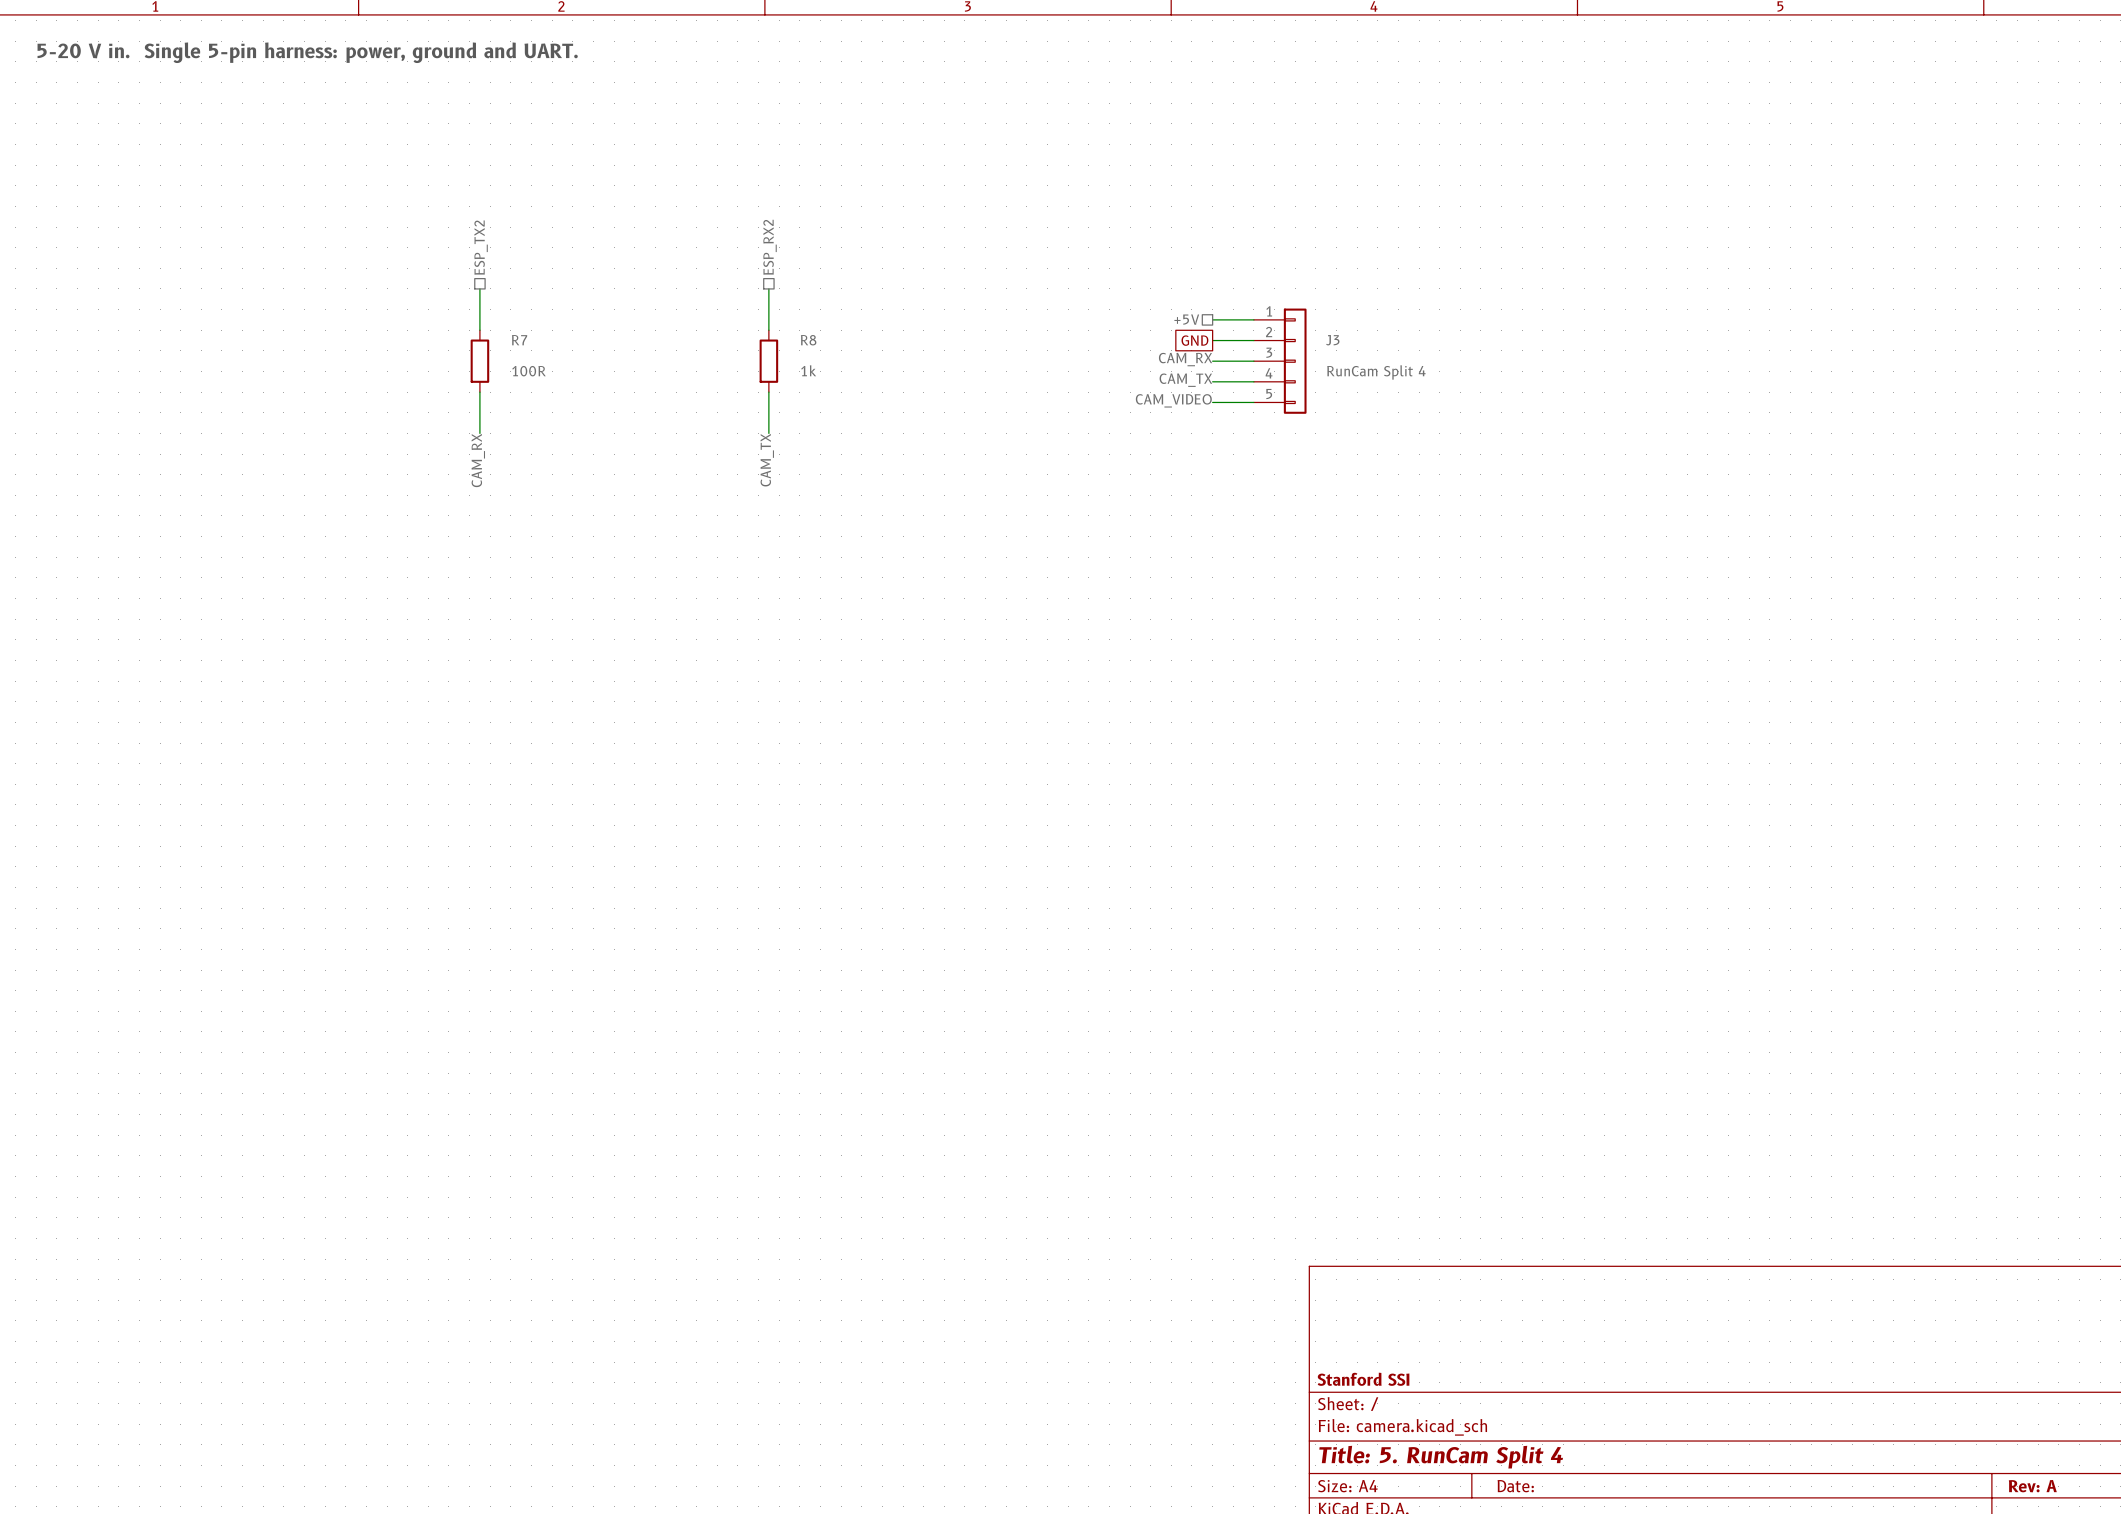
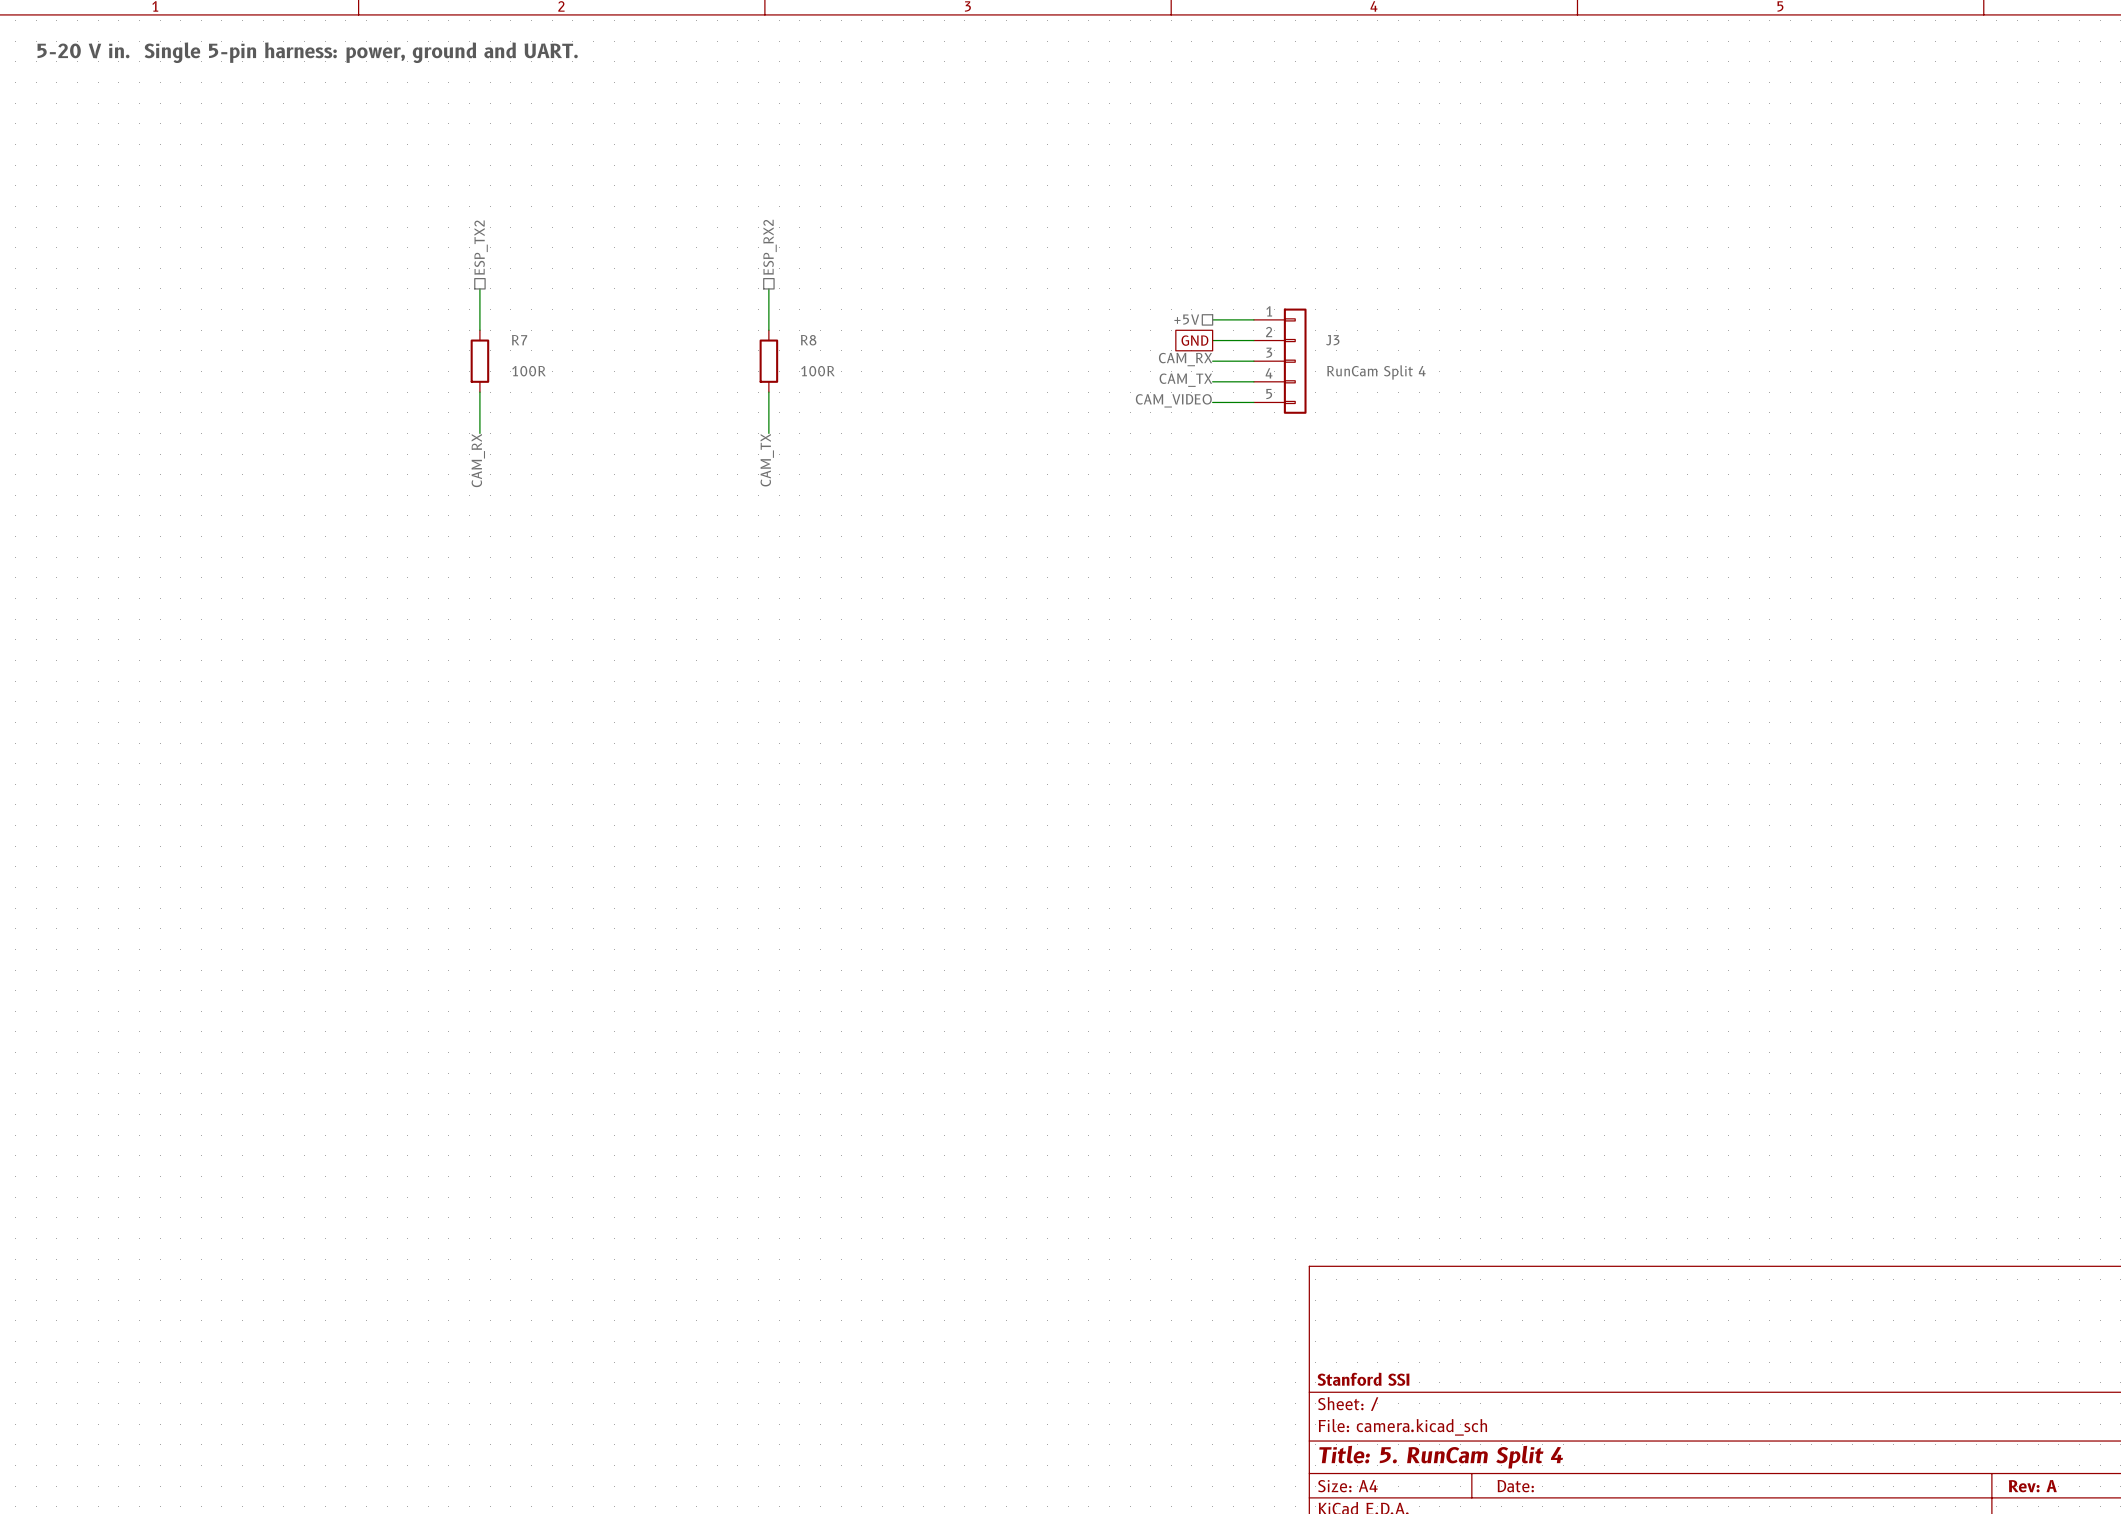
R8 value: 1k (808, 370) -> 100R (817, 371)

